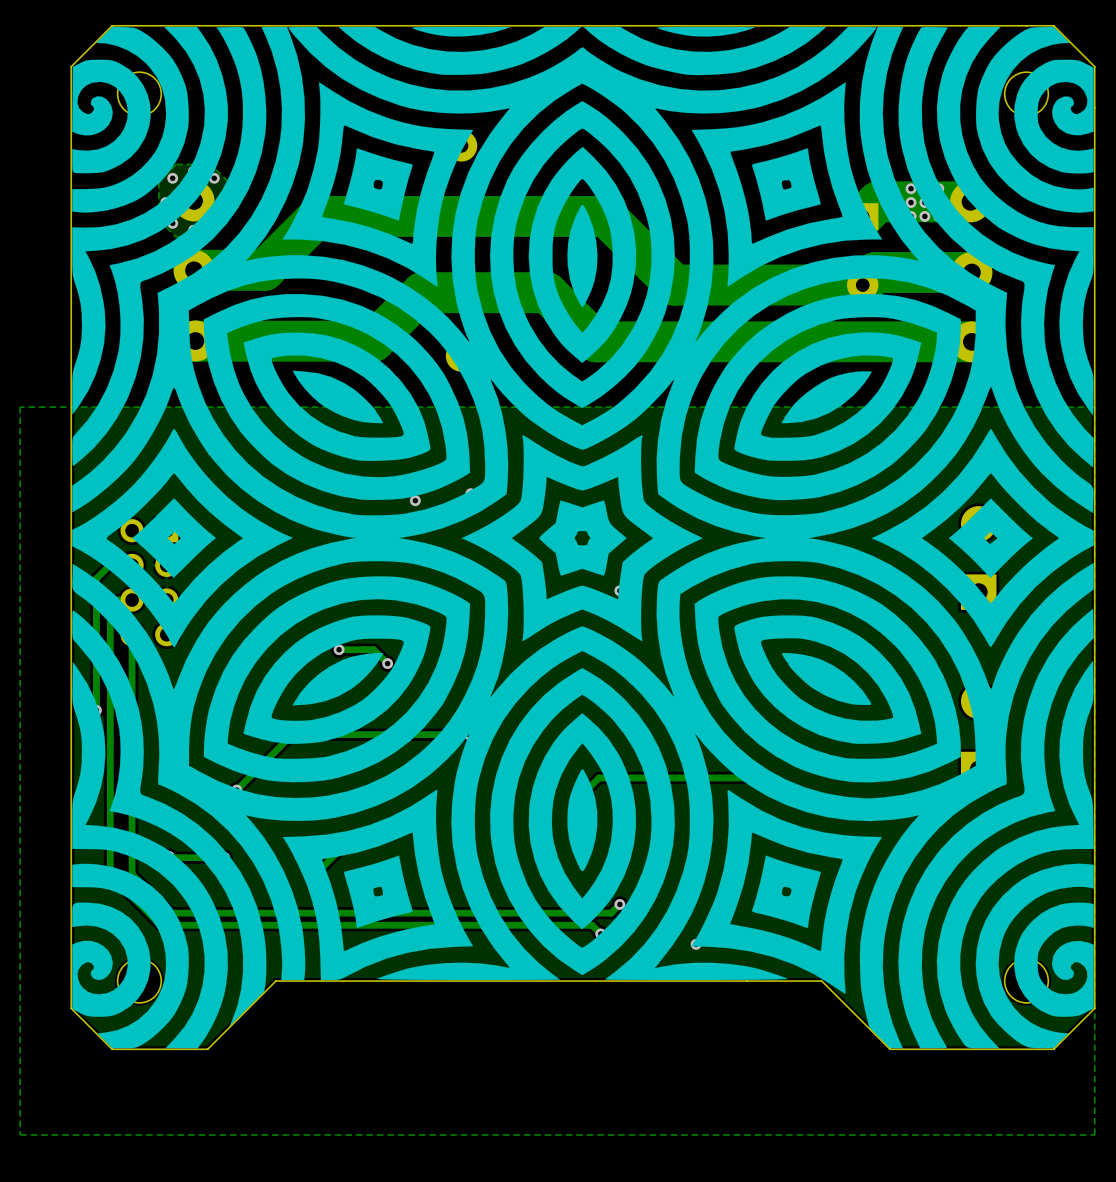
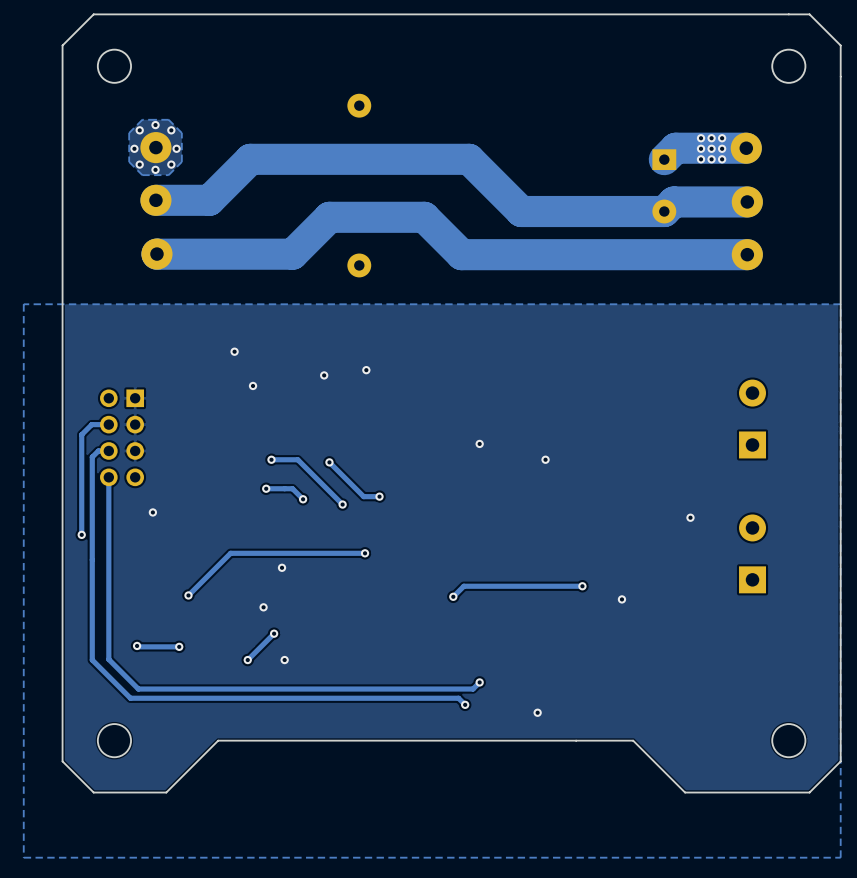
drawing: [72, 26, 1094, 1049] -> none
track: none -> (271, 459) (297, 459) (342, 504)
via: none -> (271, 459)
track: none -> (329, 462) (363, 496) (379, 496)
via: none -> (329, 462)
via: none -> (379, 496)
via: none -> (342, 504)

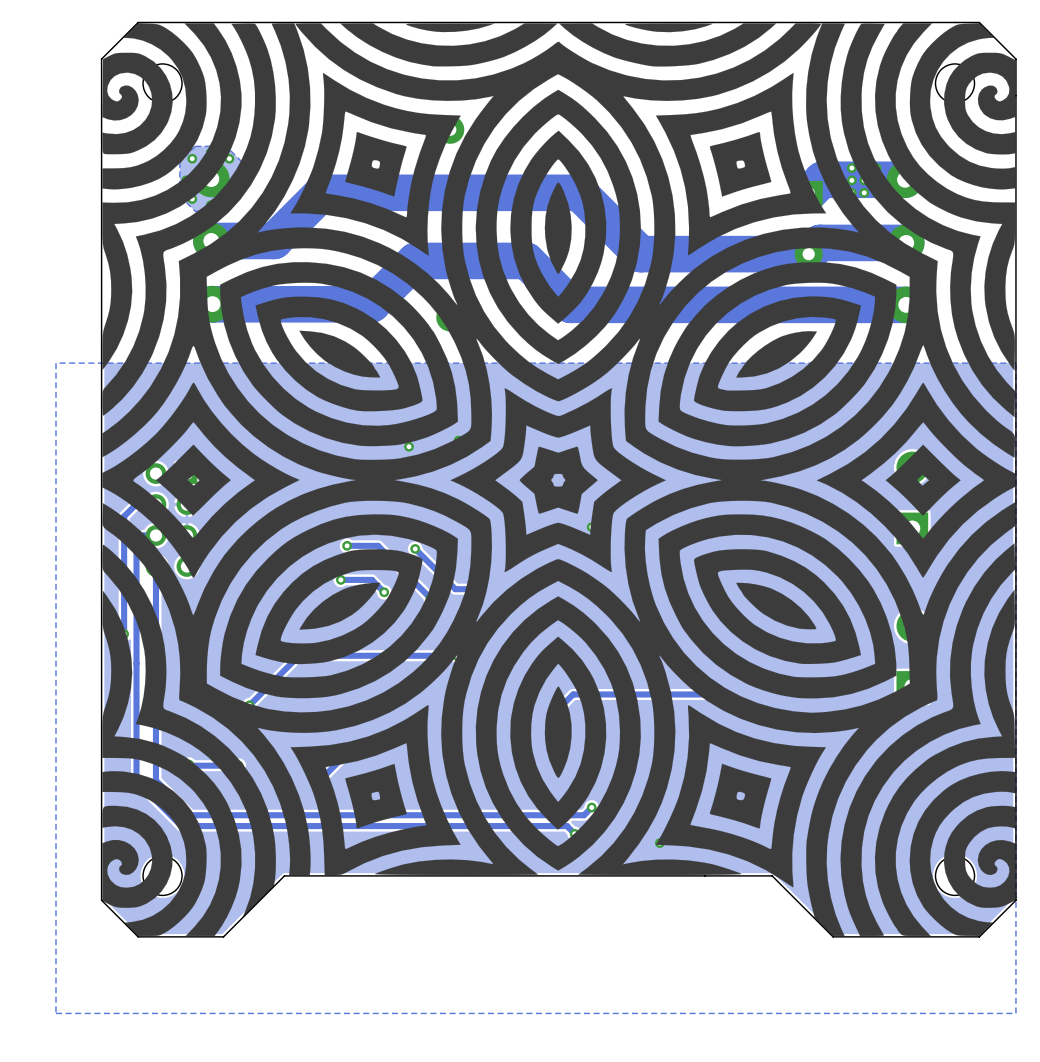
drawing: none -> [102, 23, 1016, 936]

